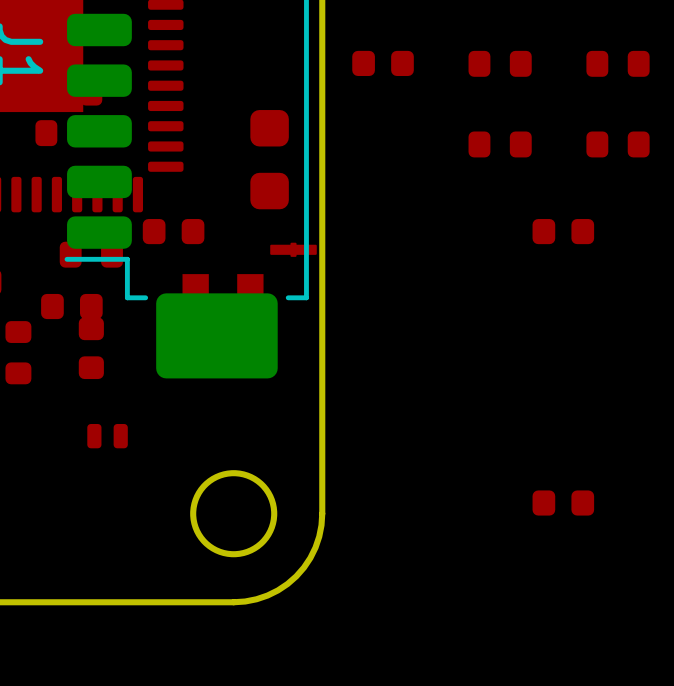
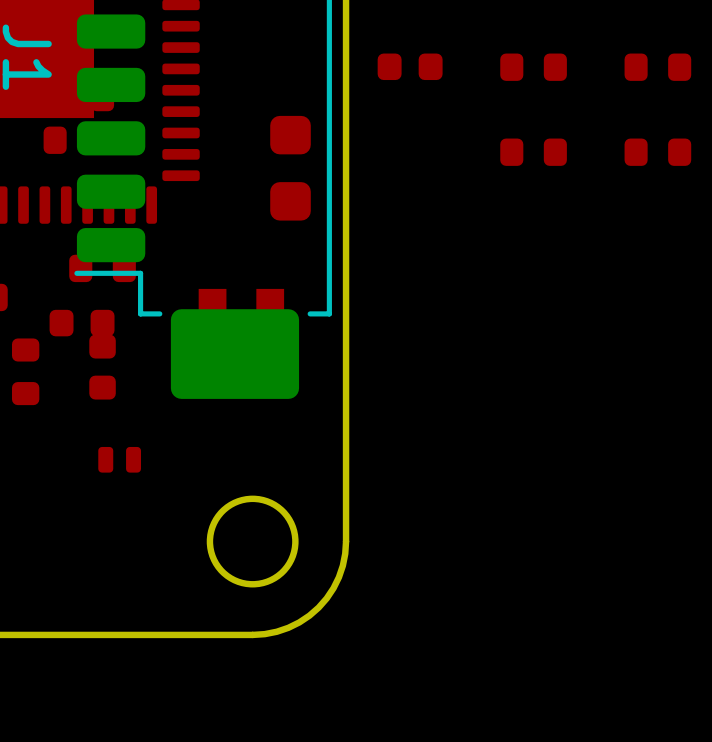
part: (173, 231) -> none
part: (563, 231) -> none
part: (293, 249) -> none
part: (563, 503) -> none

